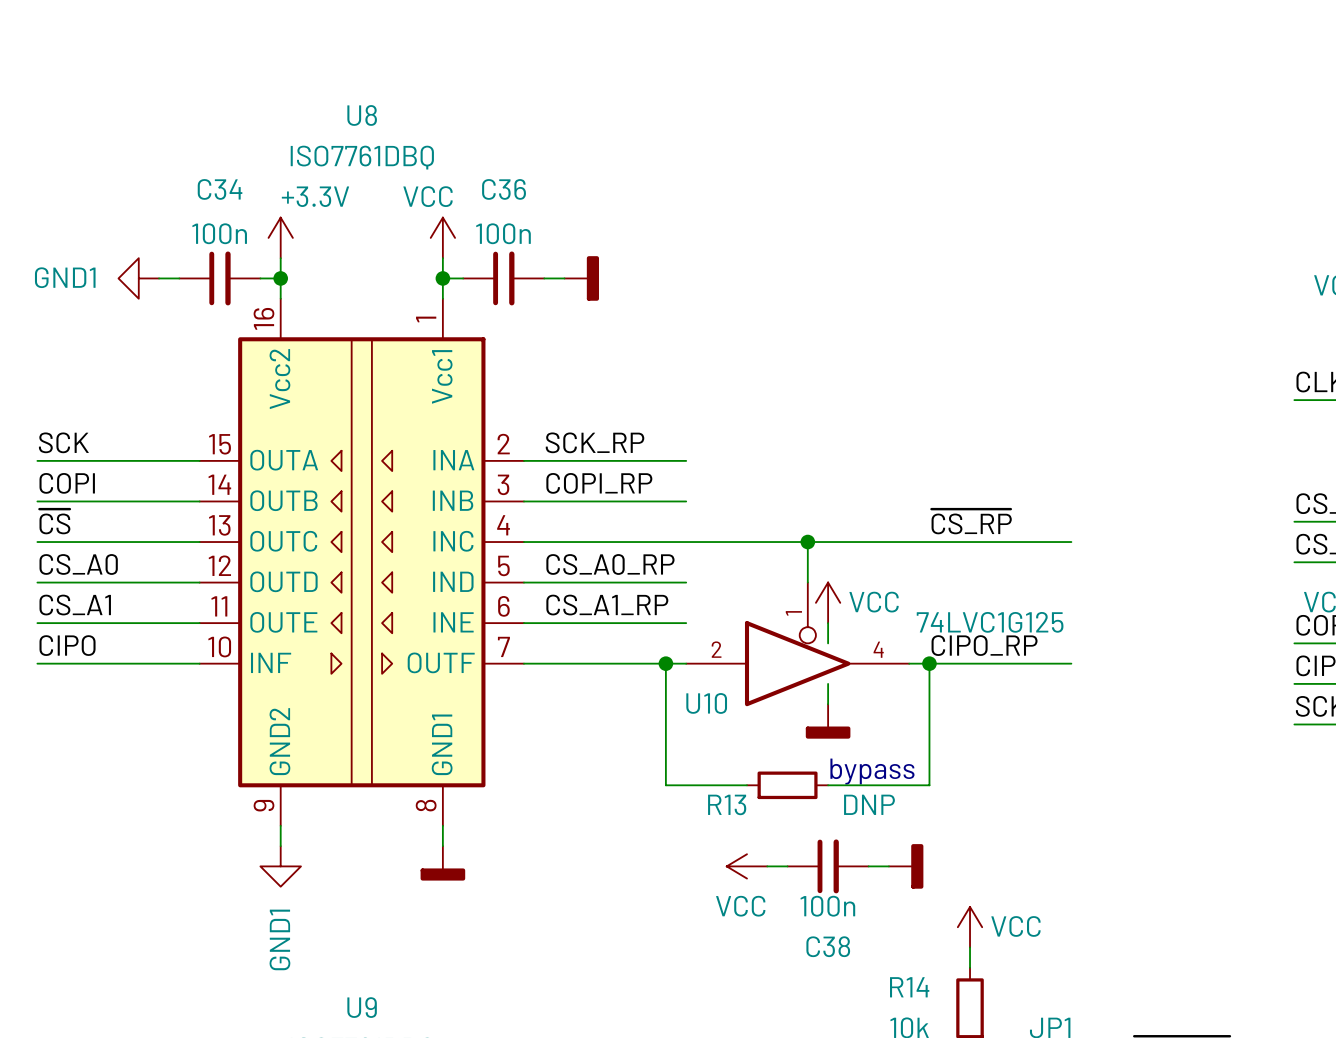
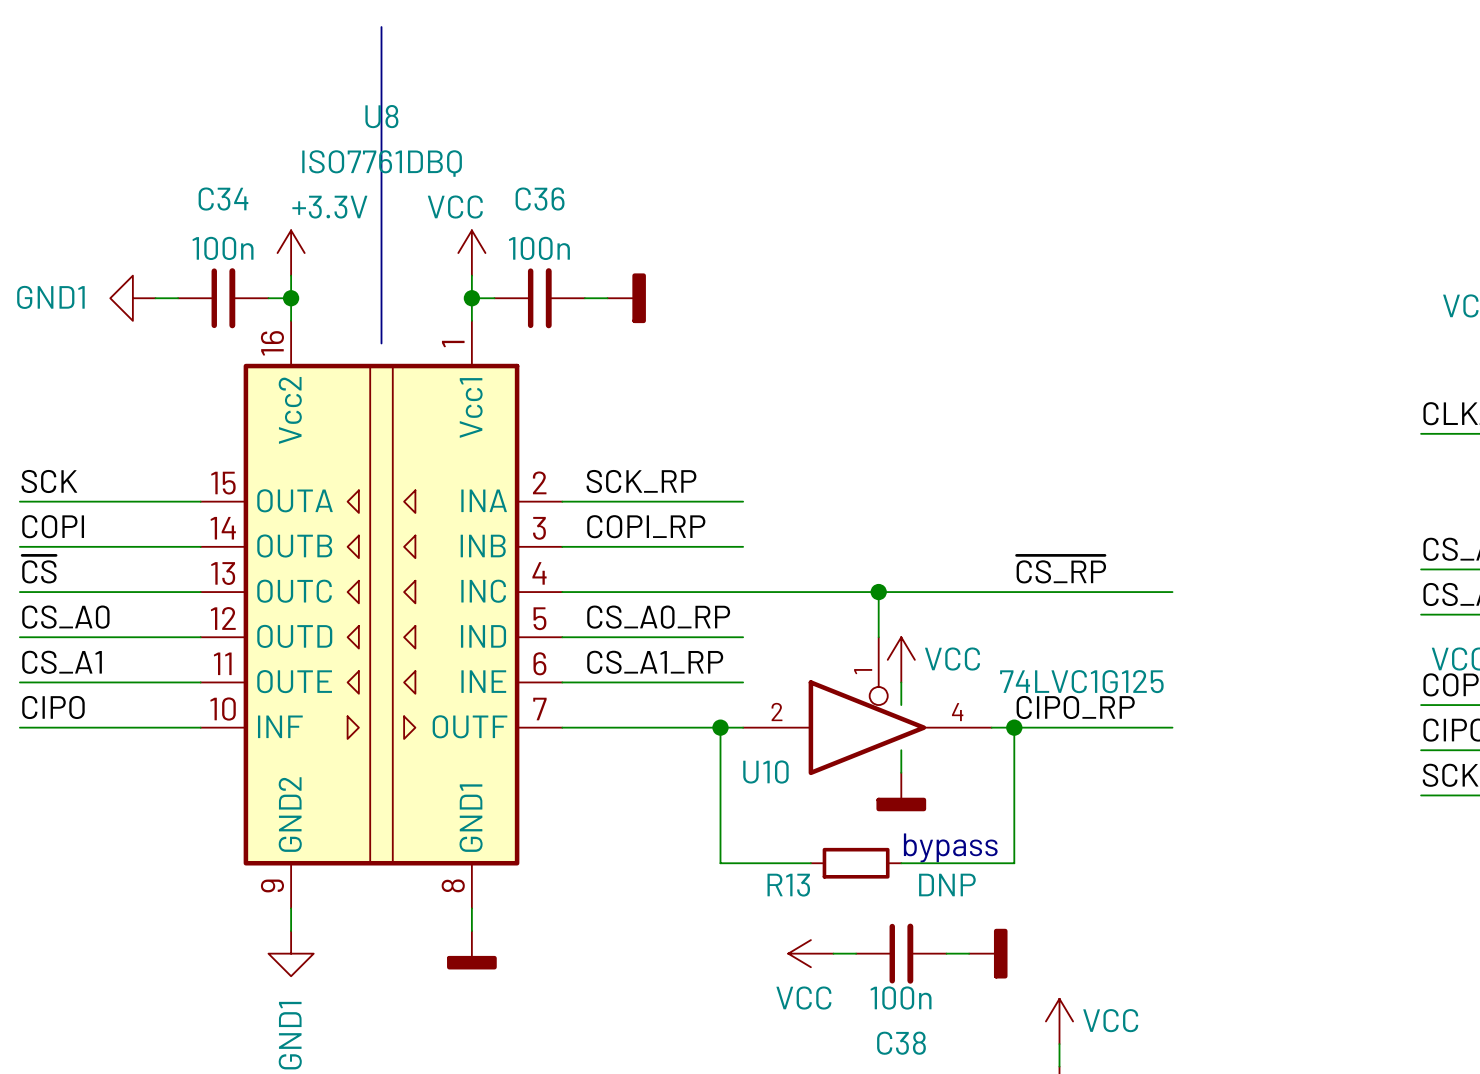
line: none -> (381, 27) (381, 343)

